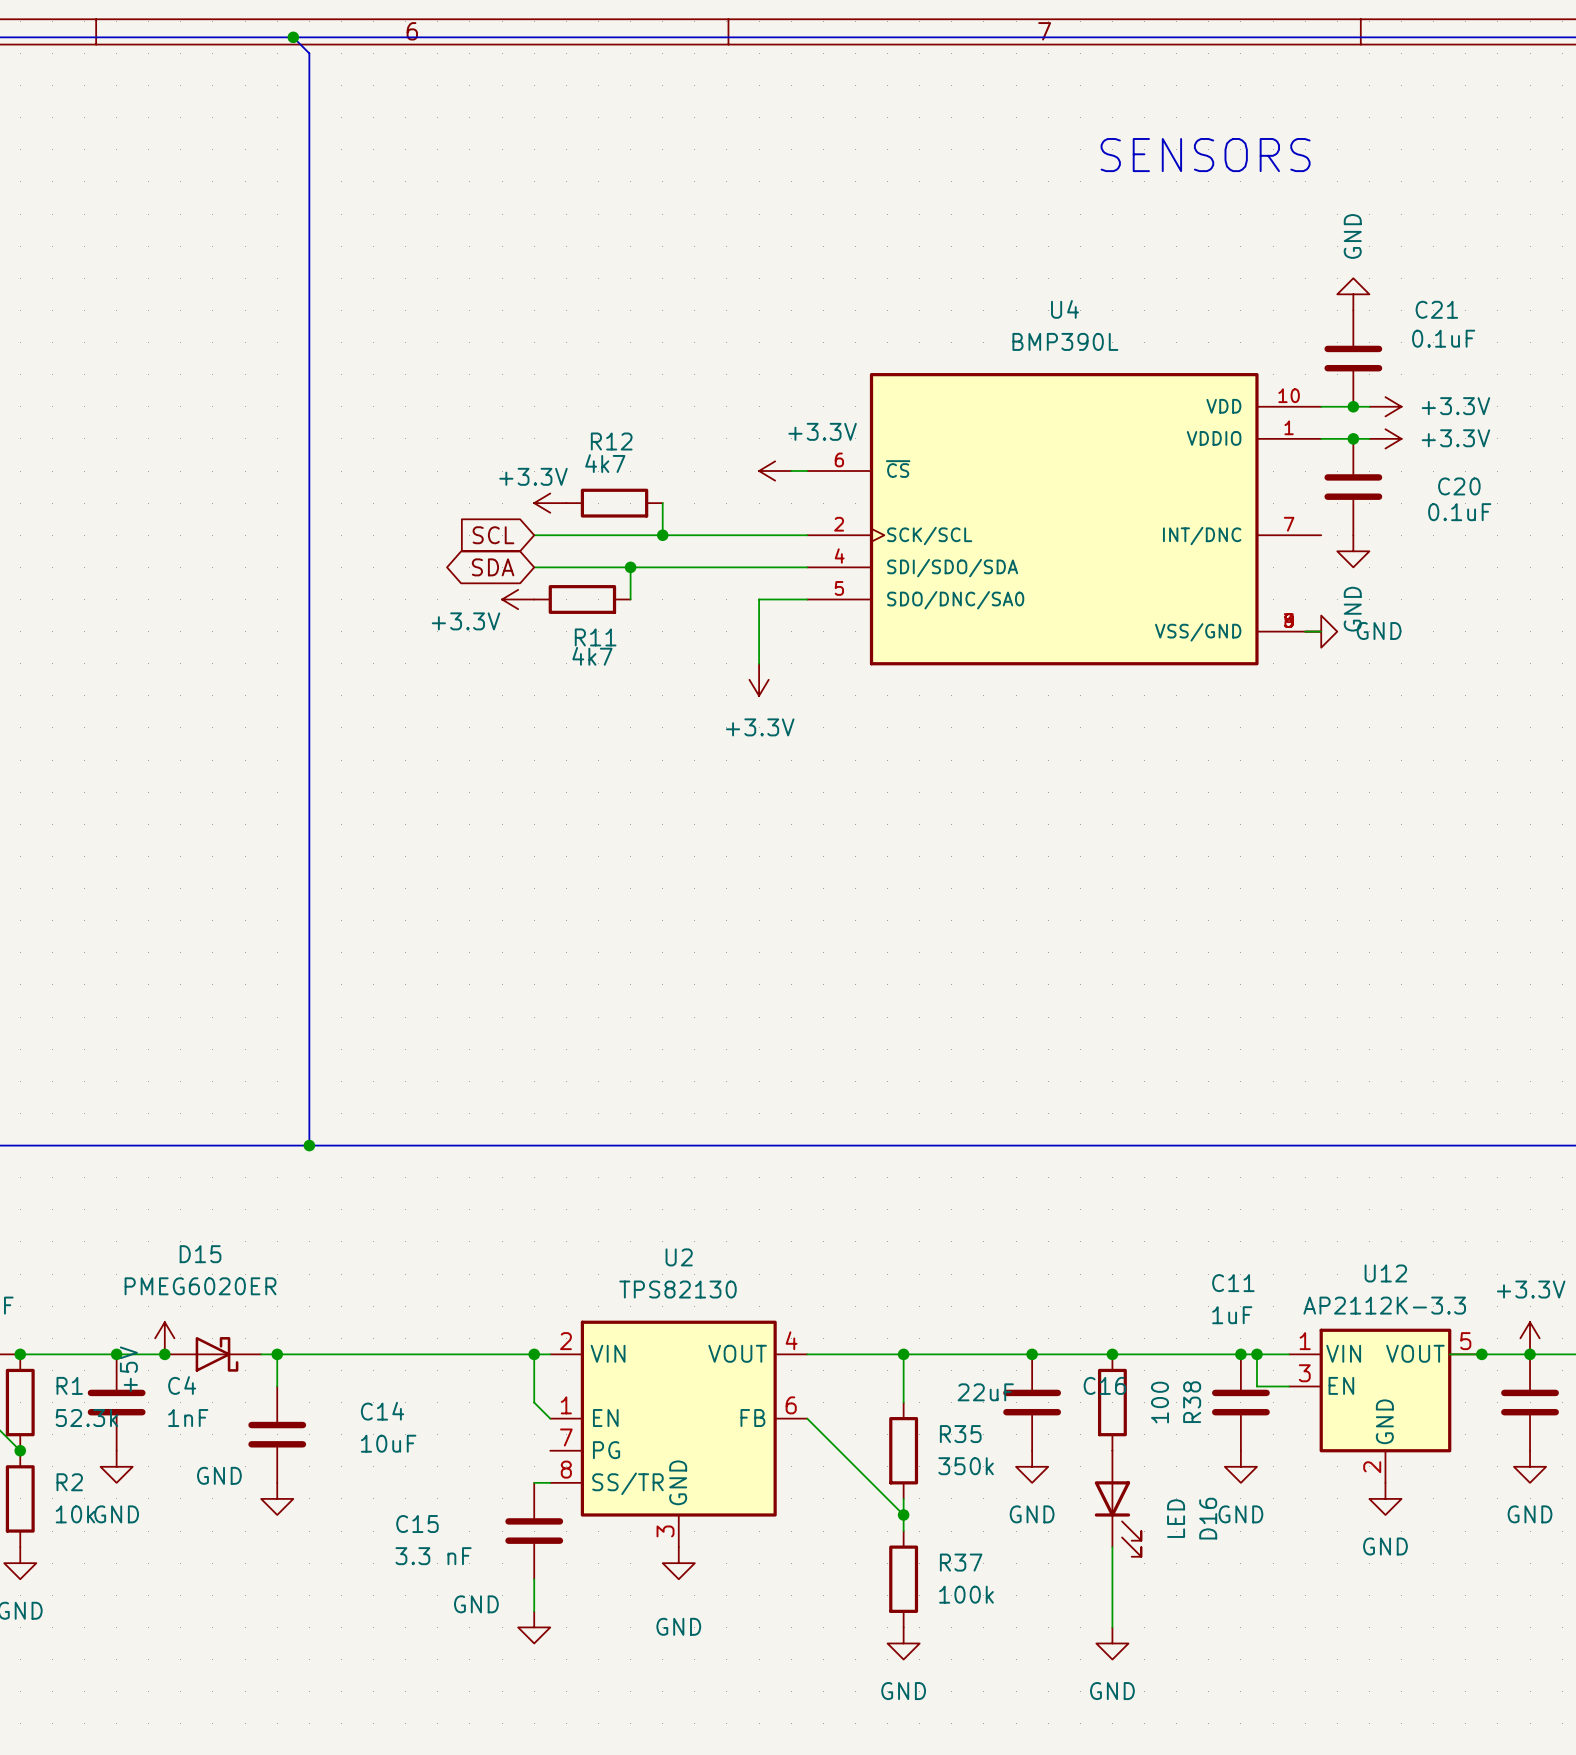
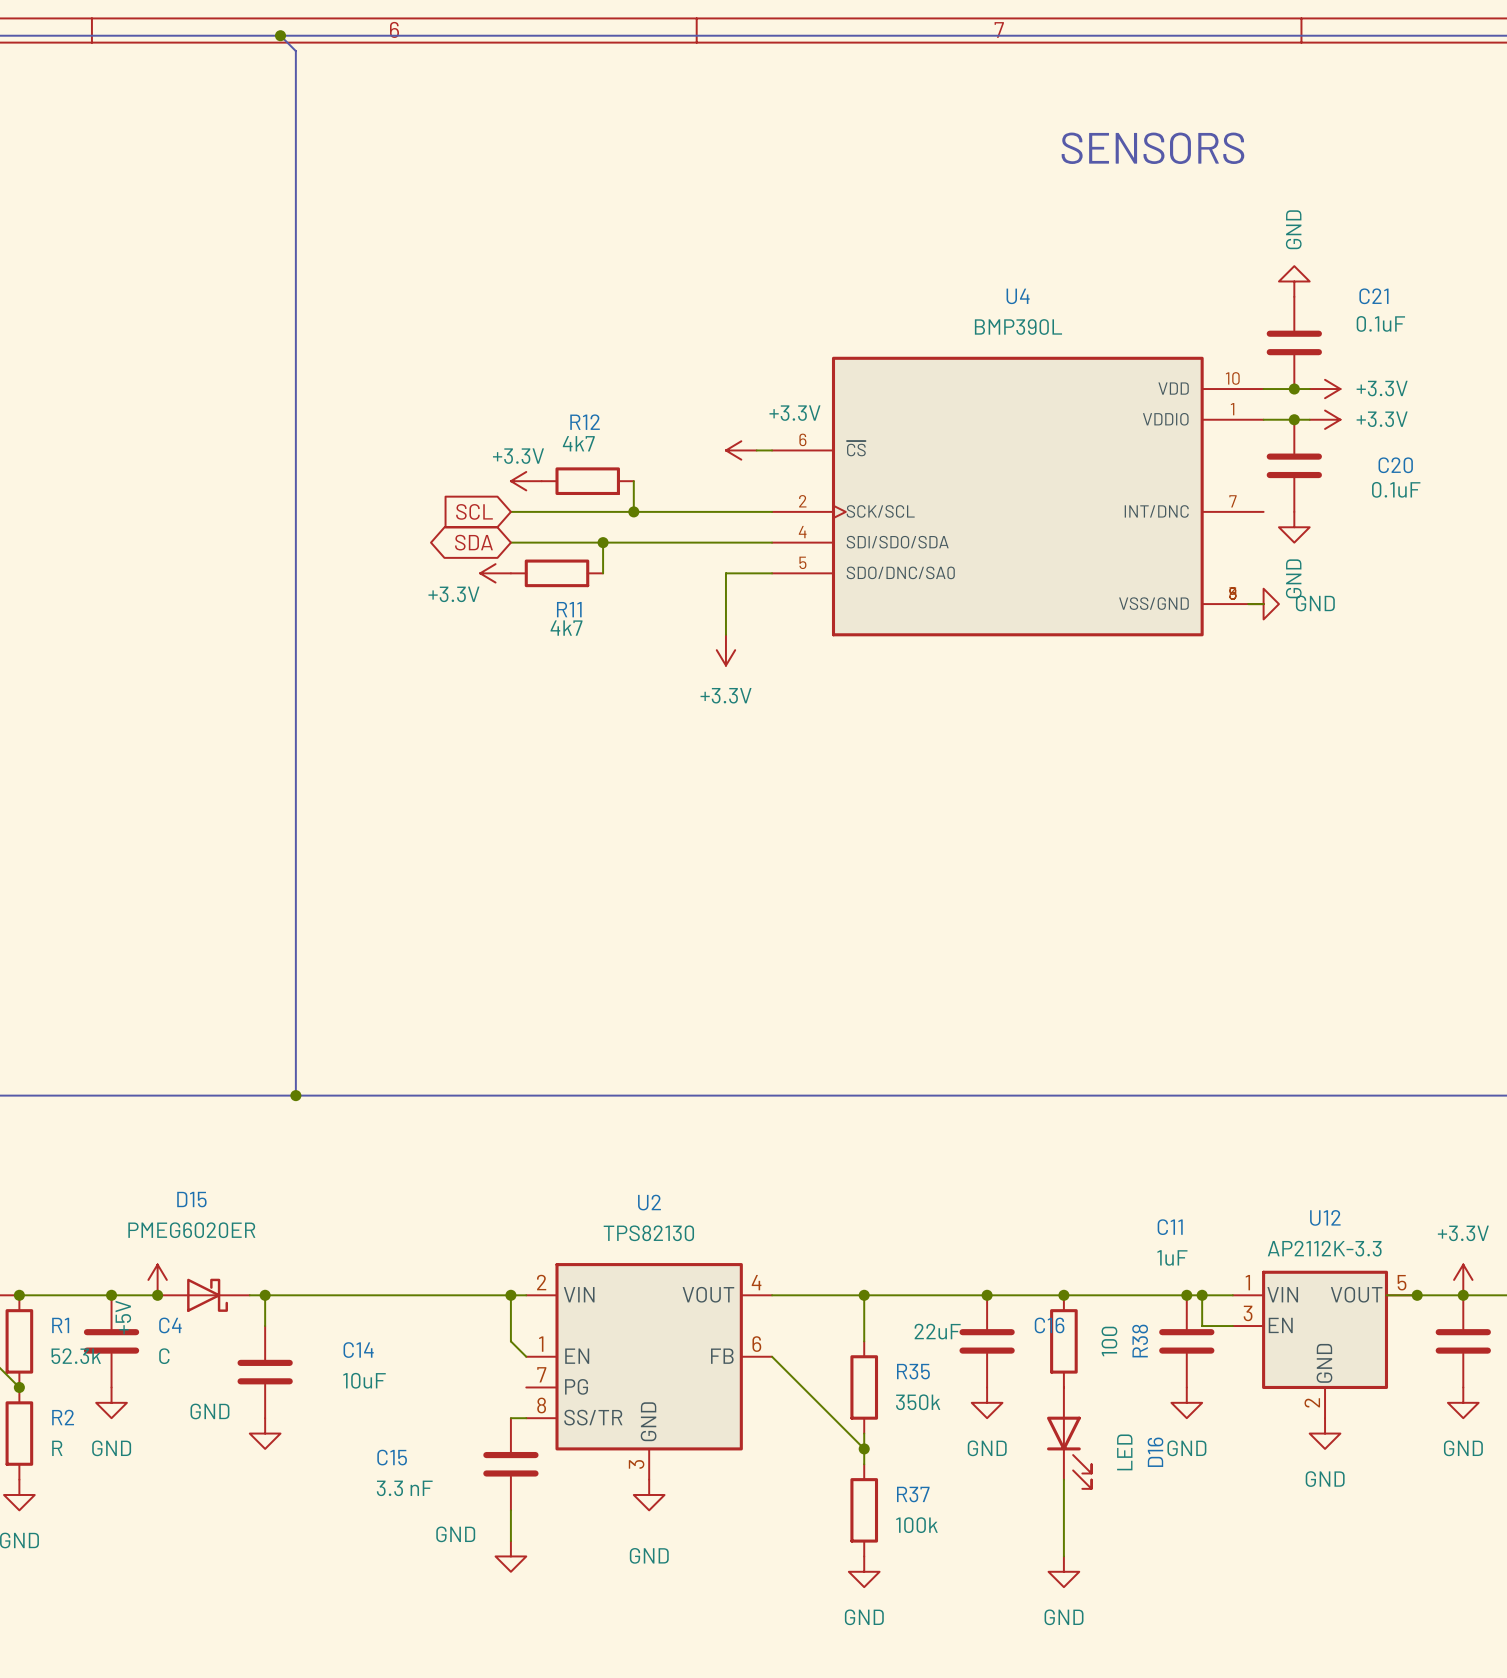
C4 value: 1nF (188, 1418) -> C (164, 1356)
R2 value: 10k (75, 1514) -> R (57, 1448)

